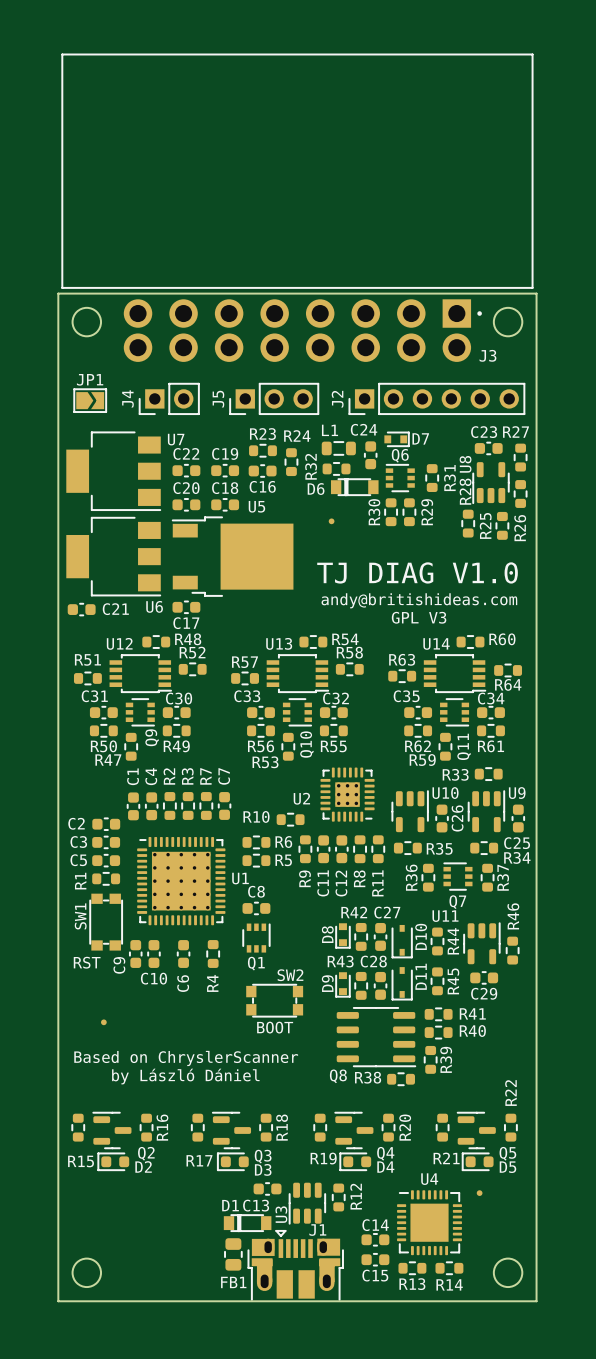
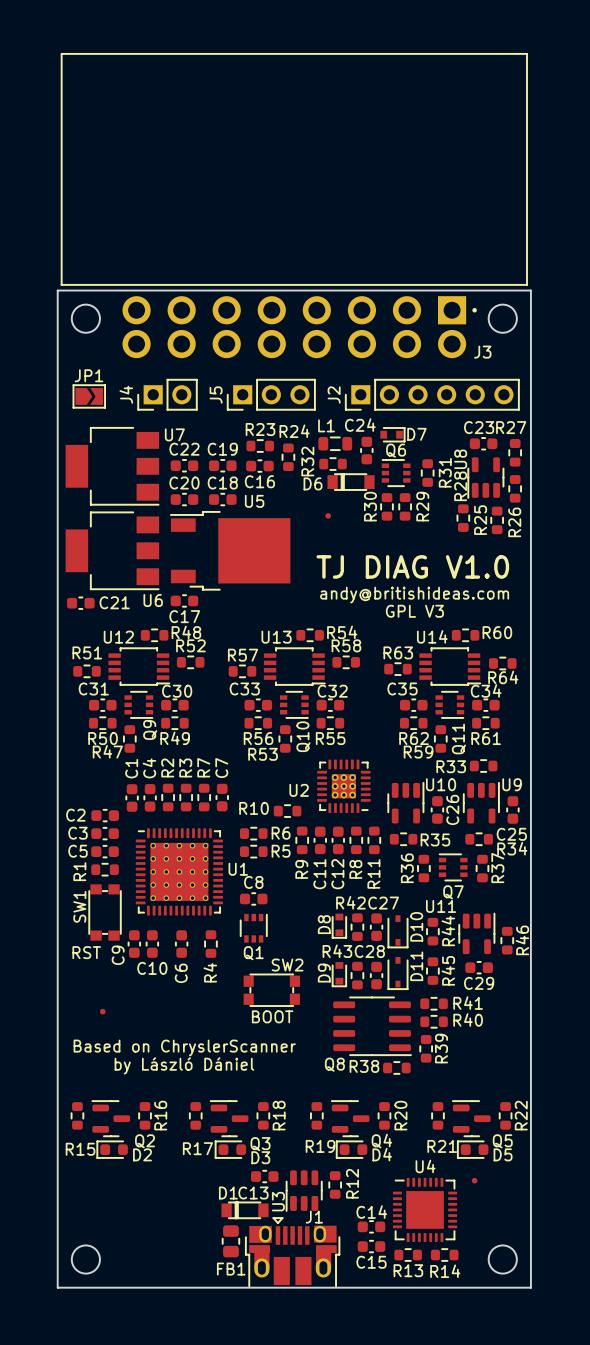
R46 name position: R46 (513, 916) -> R46 (522, 940)
R22 name position: R22 (510, 1093) -> R22 (521, 1115)

